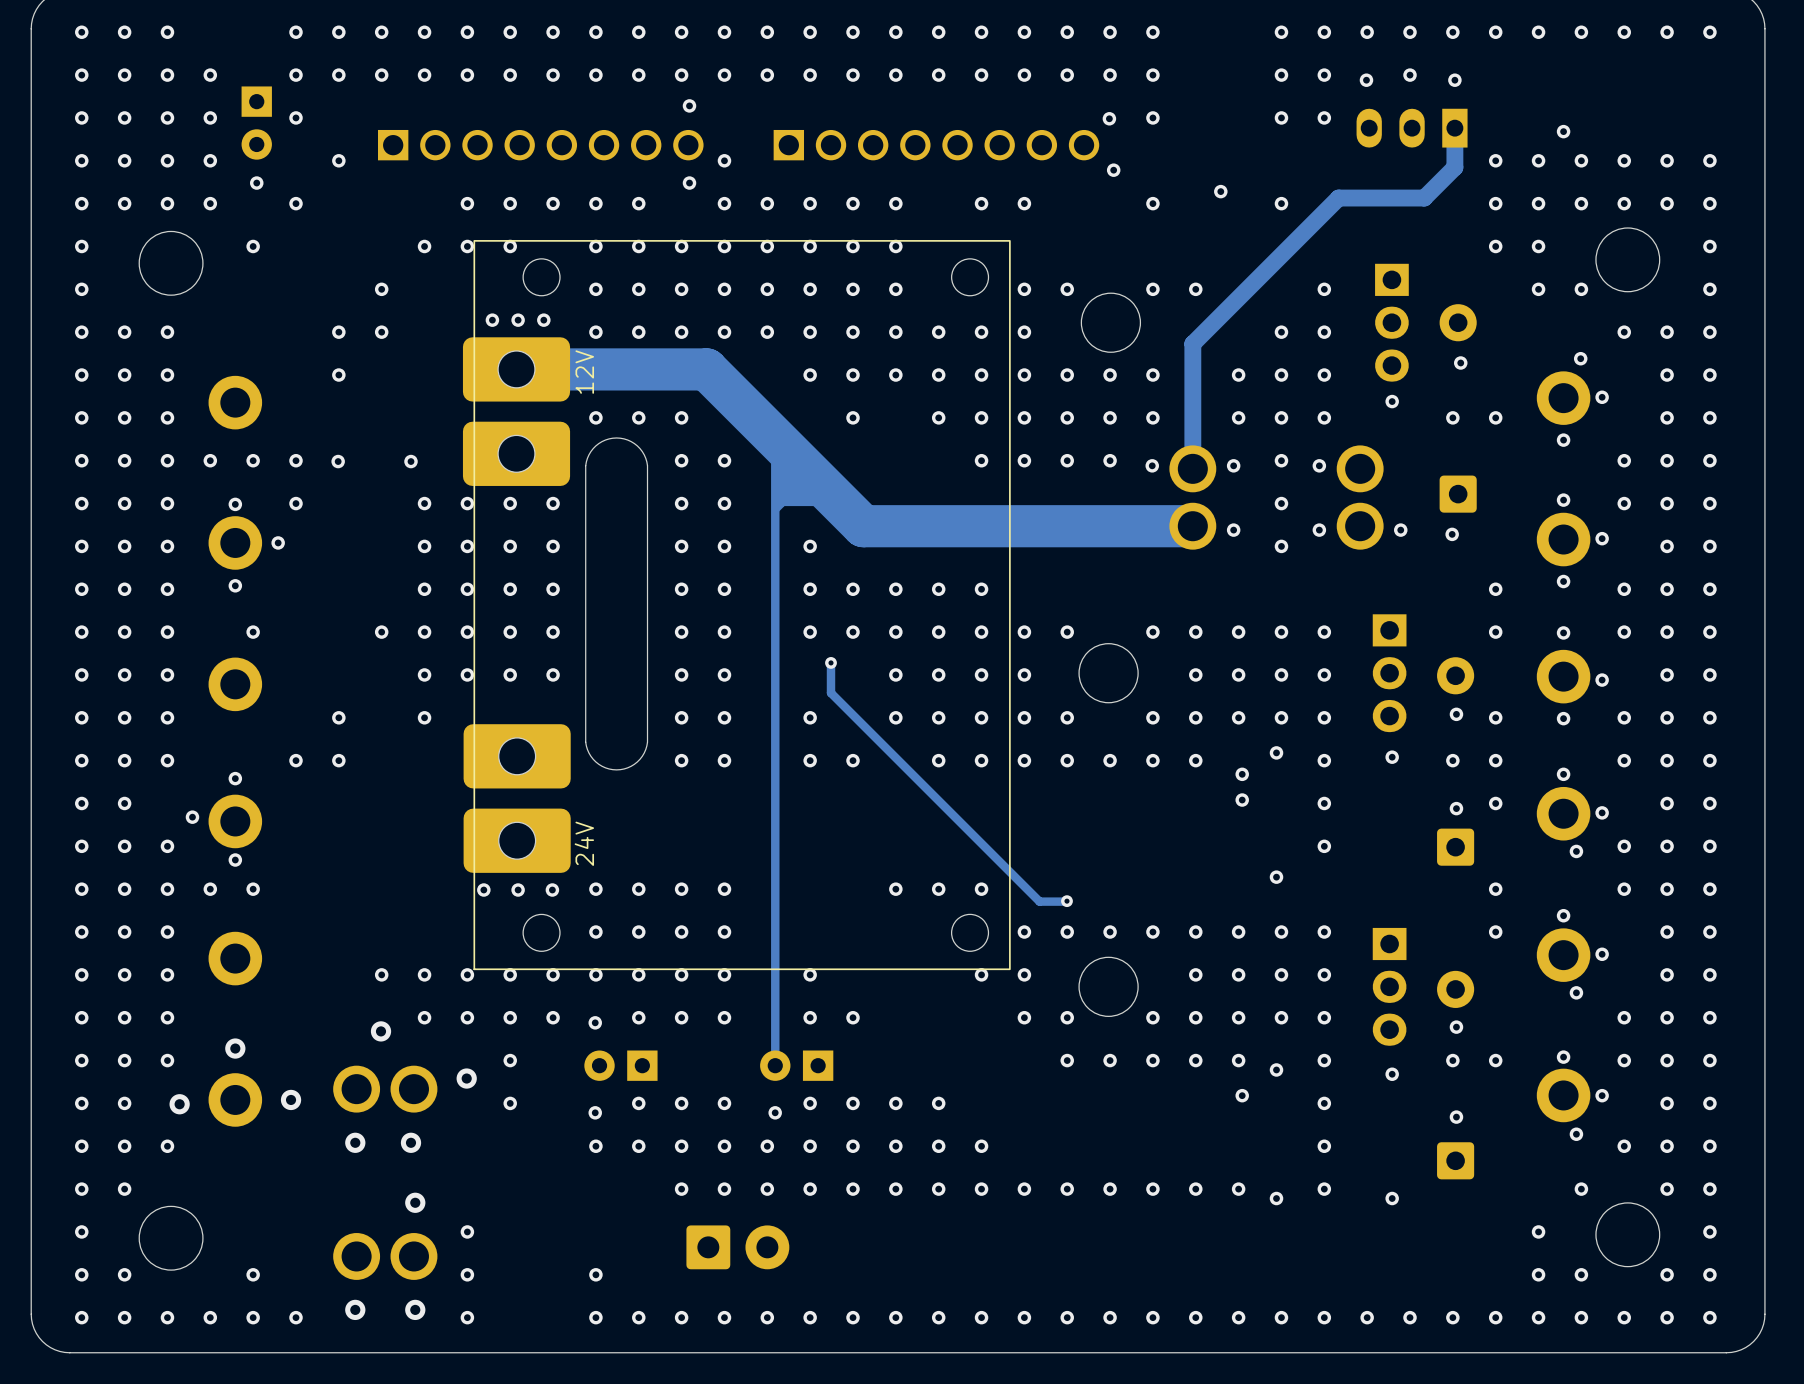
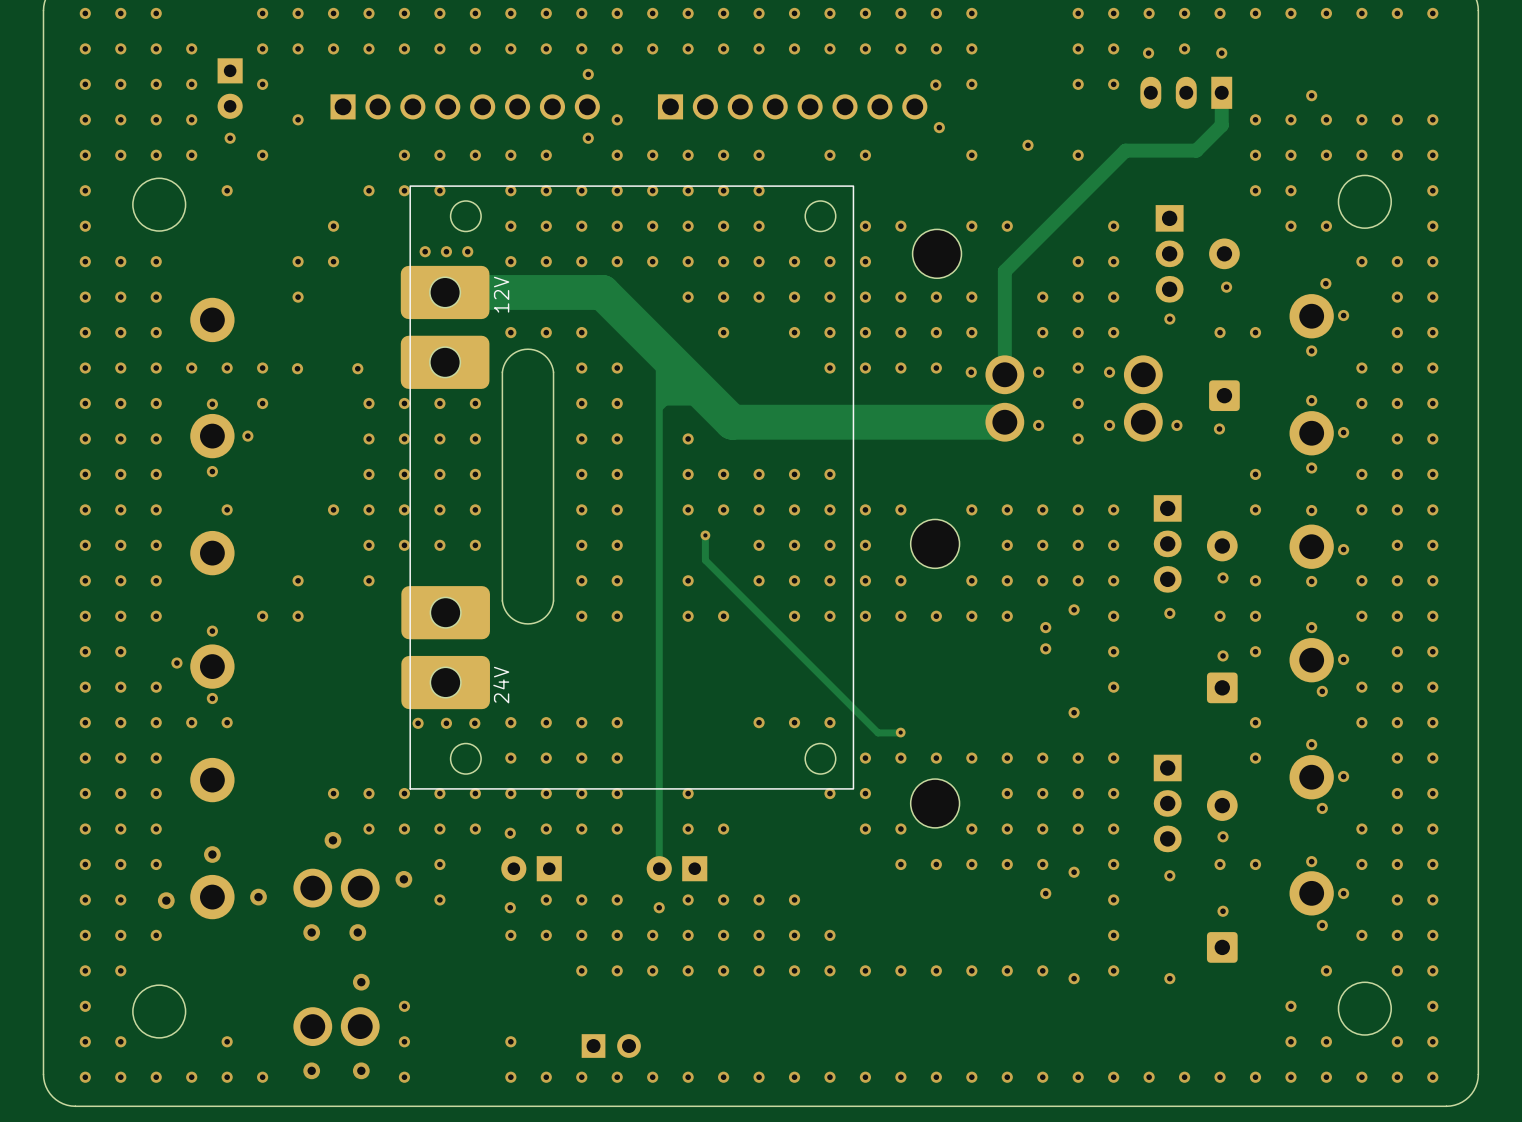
part: (737, 1247) -> none
part: none -> (611, 1046)

